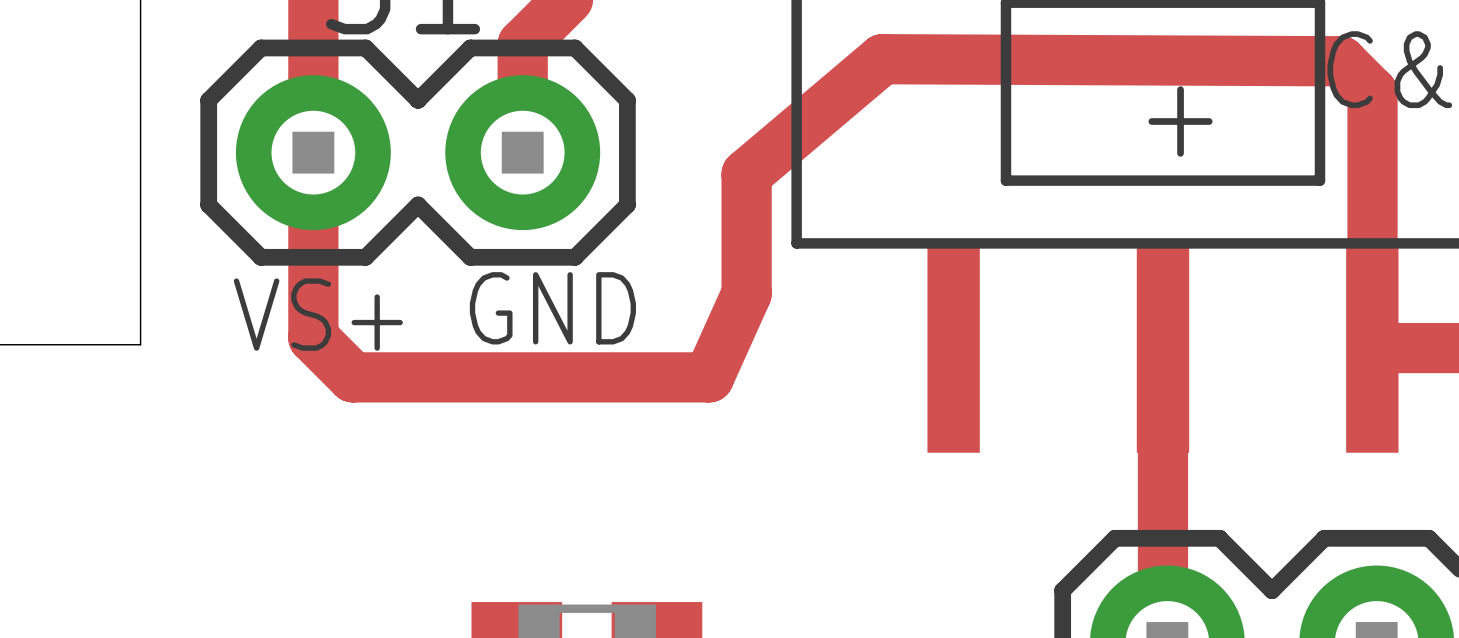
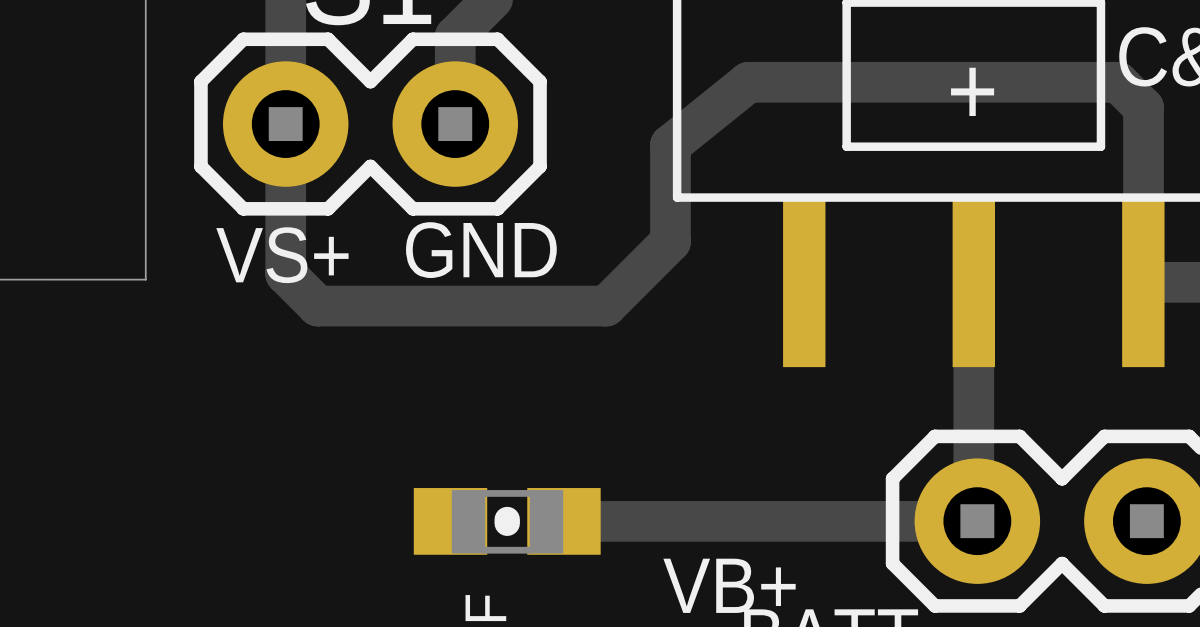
track: (1372, 132) (1372, 92) (1341, 61) (882, 59) (746, 174) (746, 293) (708, 377) -> (1143, 107) (1118, 82) (748, 82) (670, 145) (670, 241) (606, 306)

